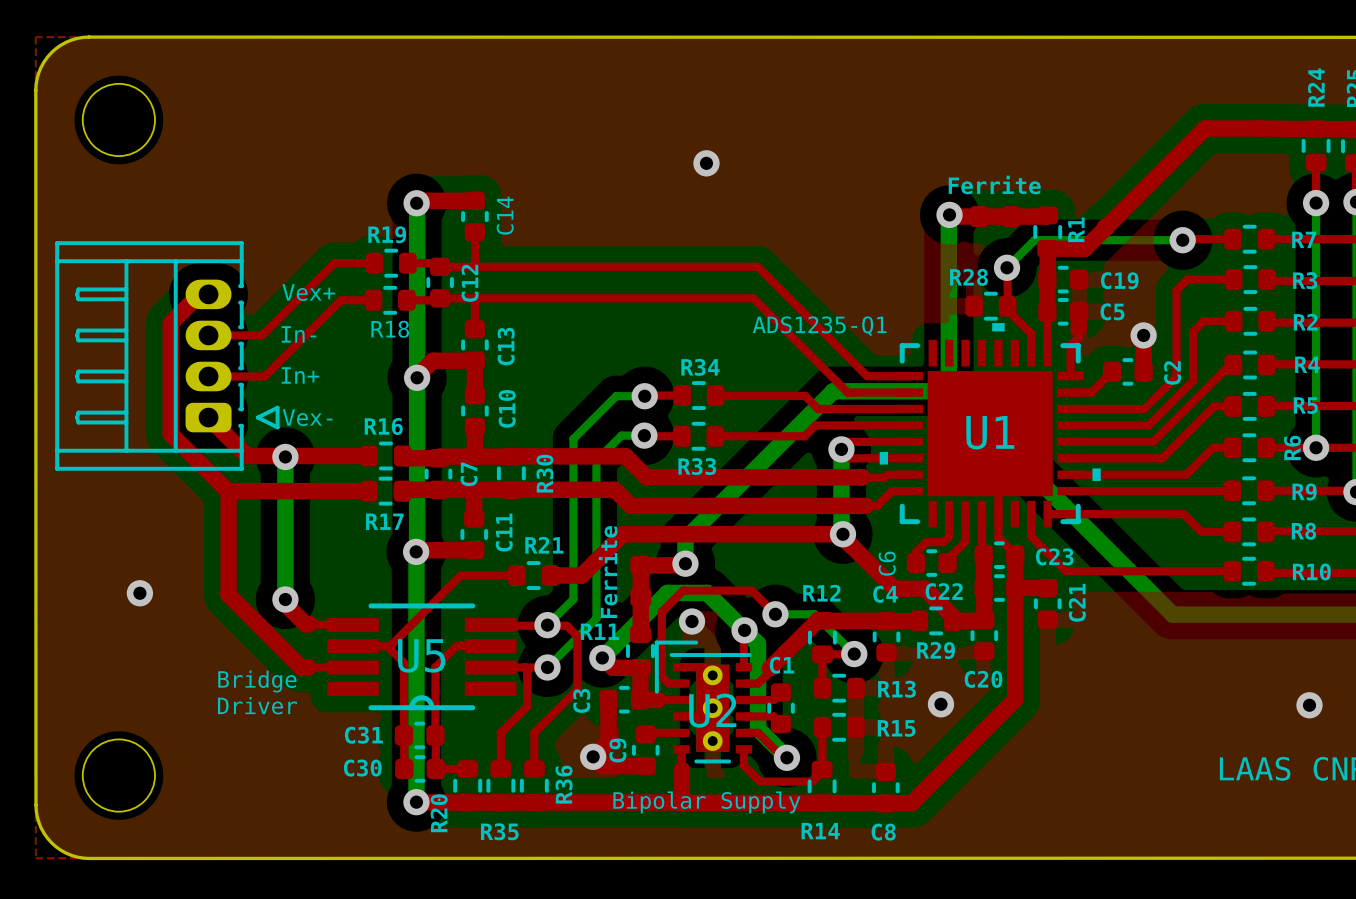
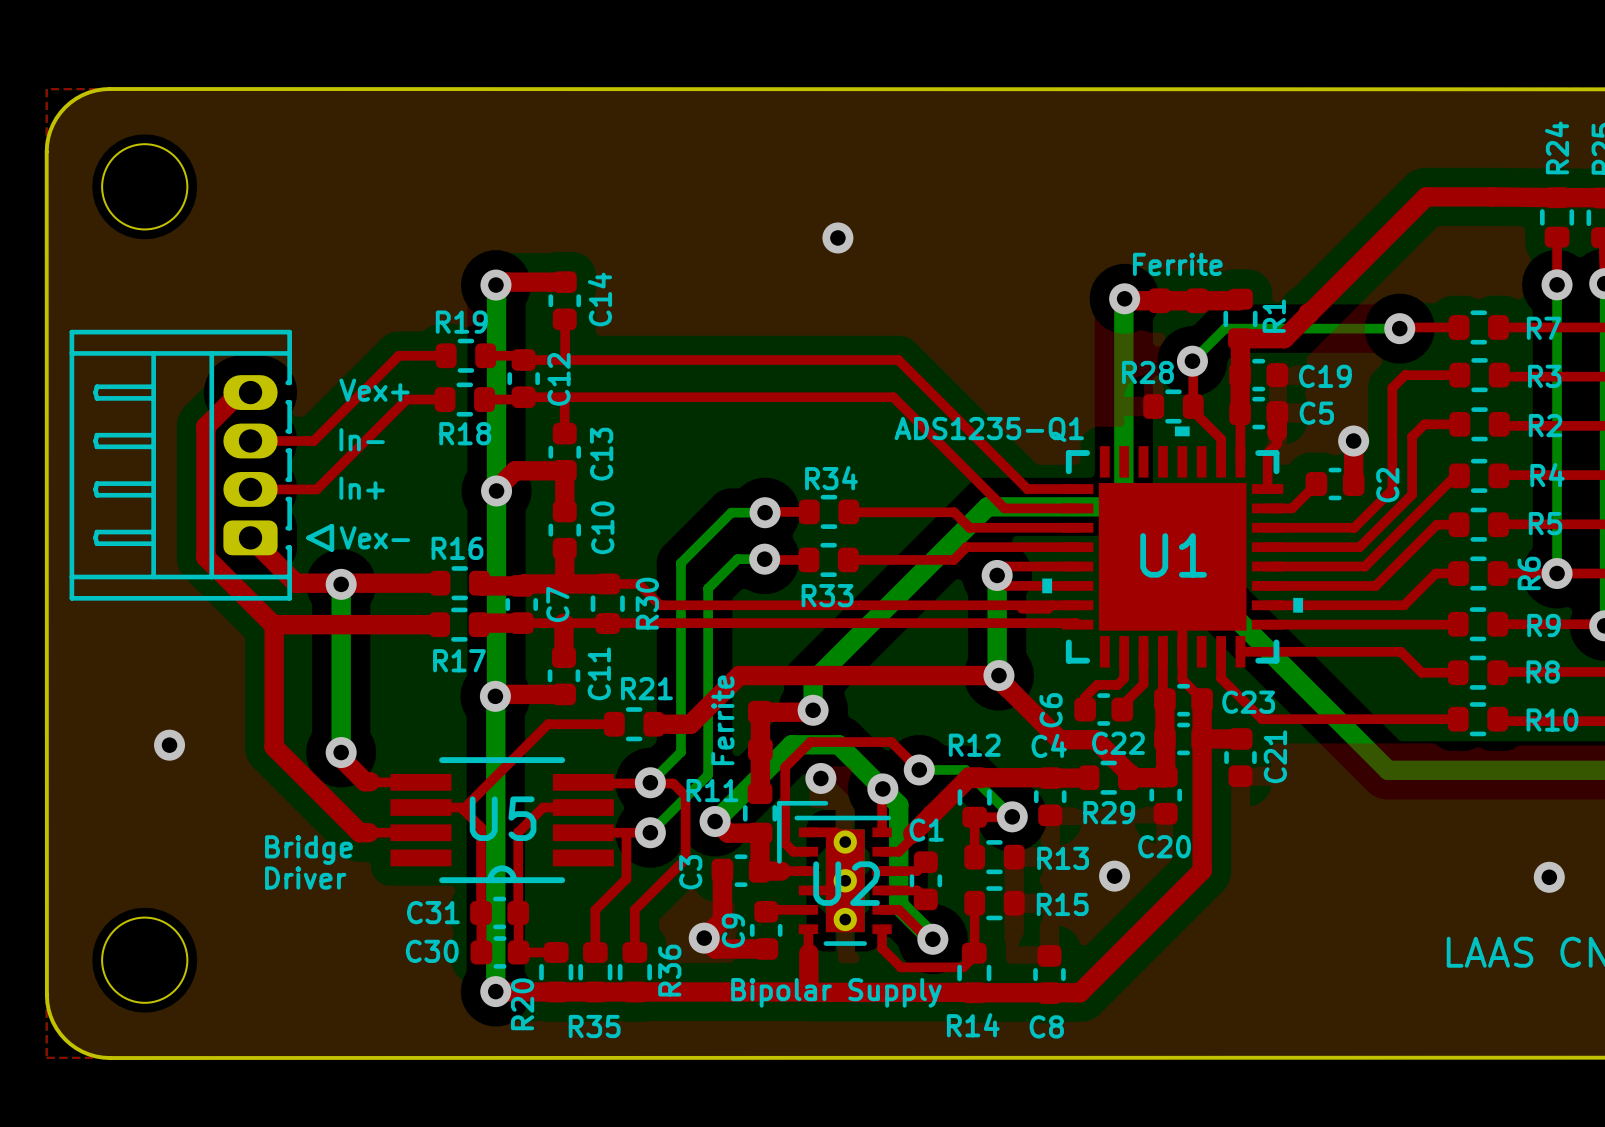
top track: (511, 456) (625, 456) (646, 477) (862, 477) -> (607, 583) (638, 583) (660, 605) (1051, 605)
top track width: thick (438, 489) (614, 489) -> thin (521, 623) (729, 623)
top track: (614, 489) (630, 505) (877, 505) (892, 491) (909, 491) -> (729, 623) (1076, 623) (1077, 624)

